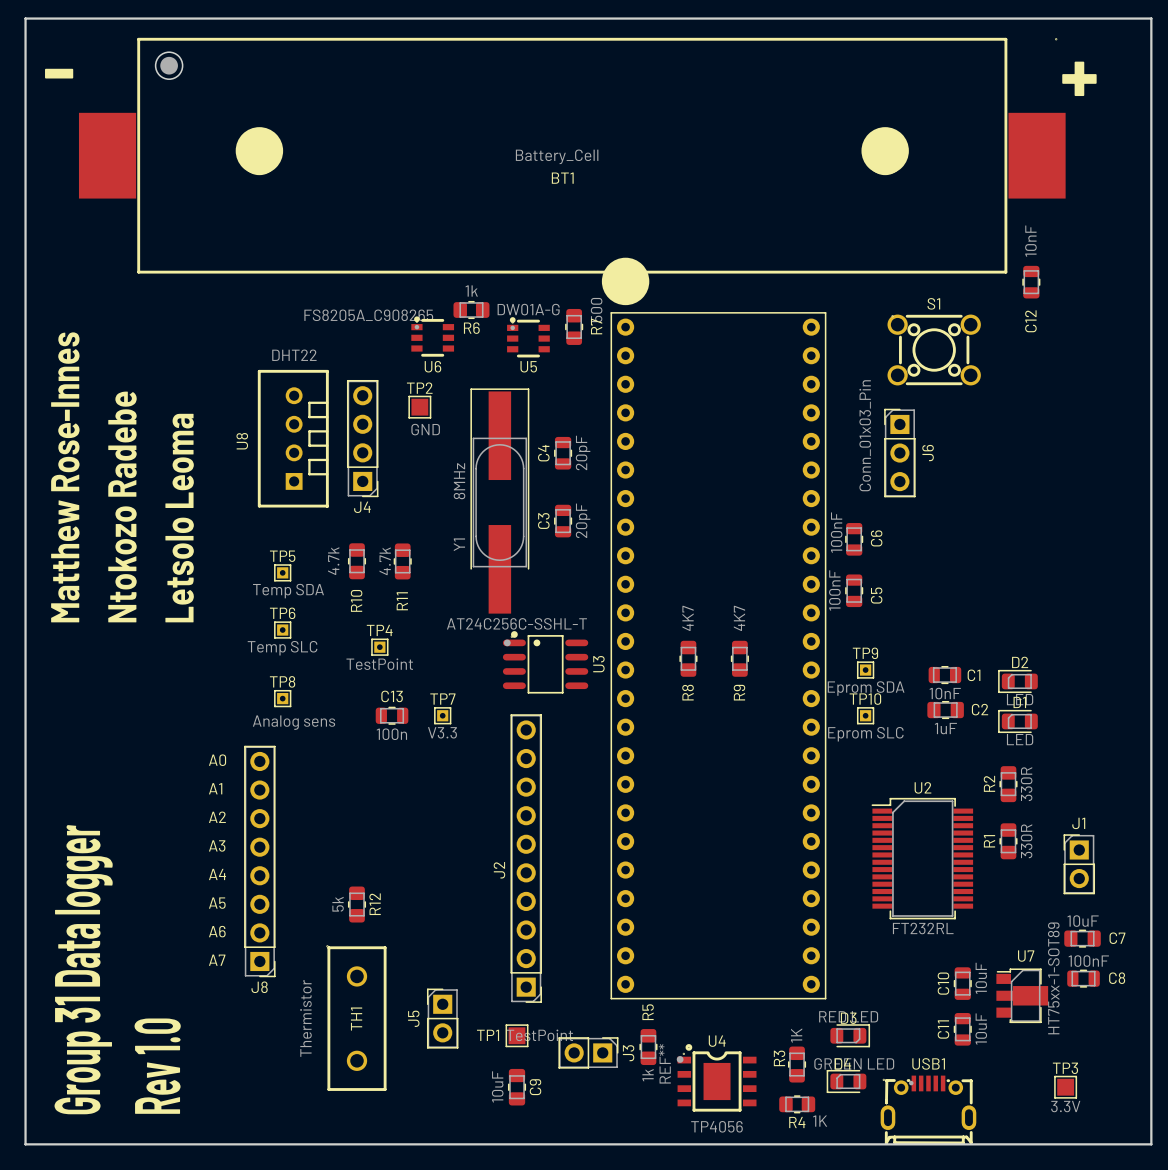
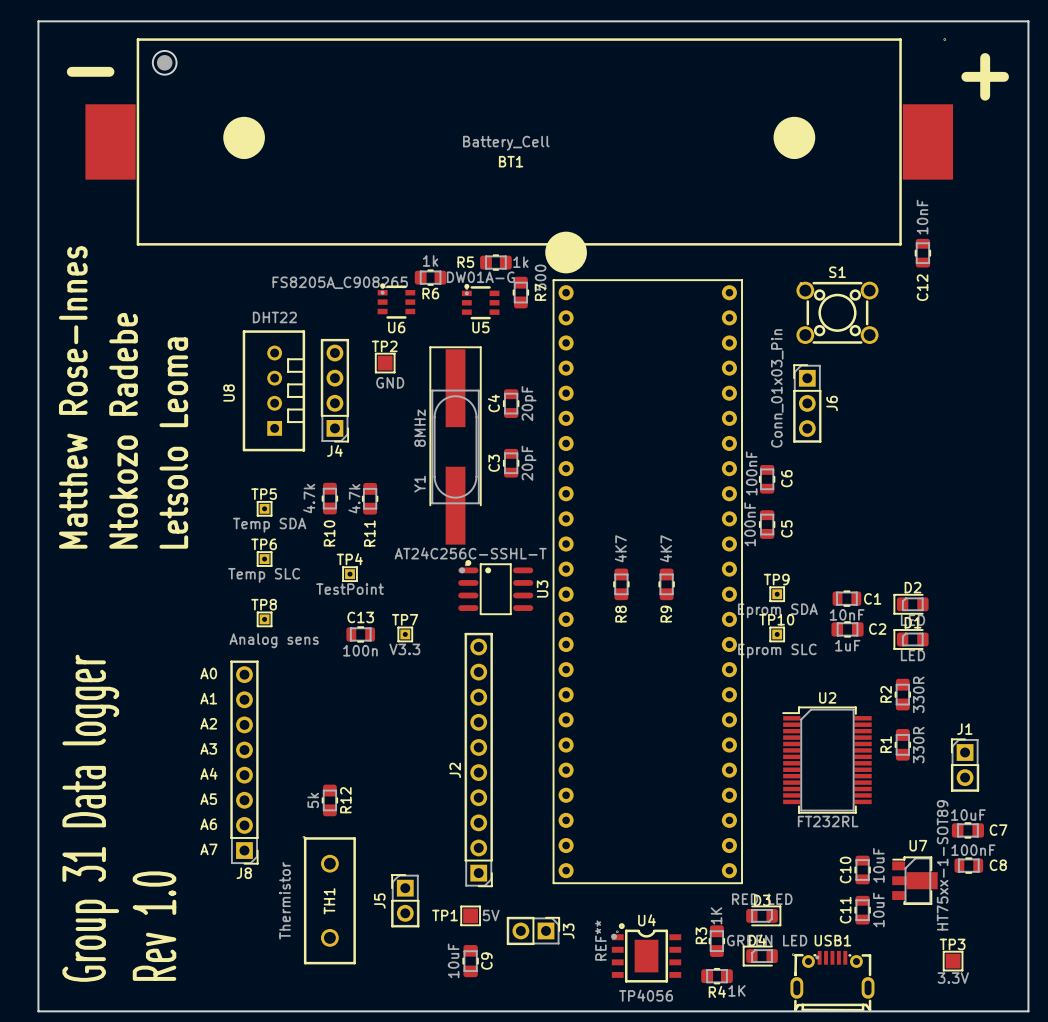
R5 name position: R5 (648, 1012) -> R5 (465, 262)
TP1 value: TestPoint (539, 1035) -> 5V (491, 915)
R5 rotation: 0° (648, 1047) -> 90° clockwise (495, 262)
R5 position: (648, 1047) -> (495, 262)
R5 value position: 1k (648, 1075) -> 1k (520, 262)

